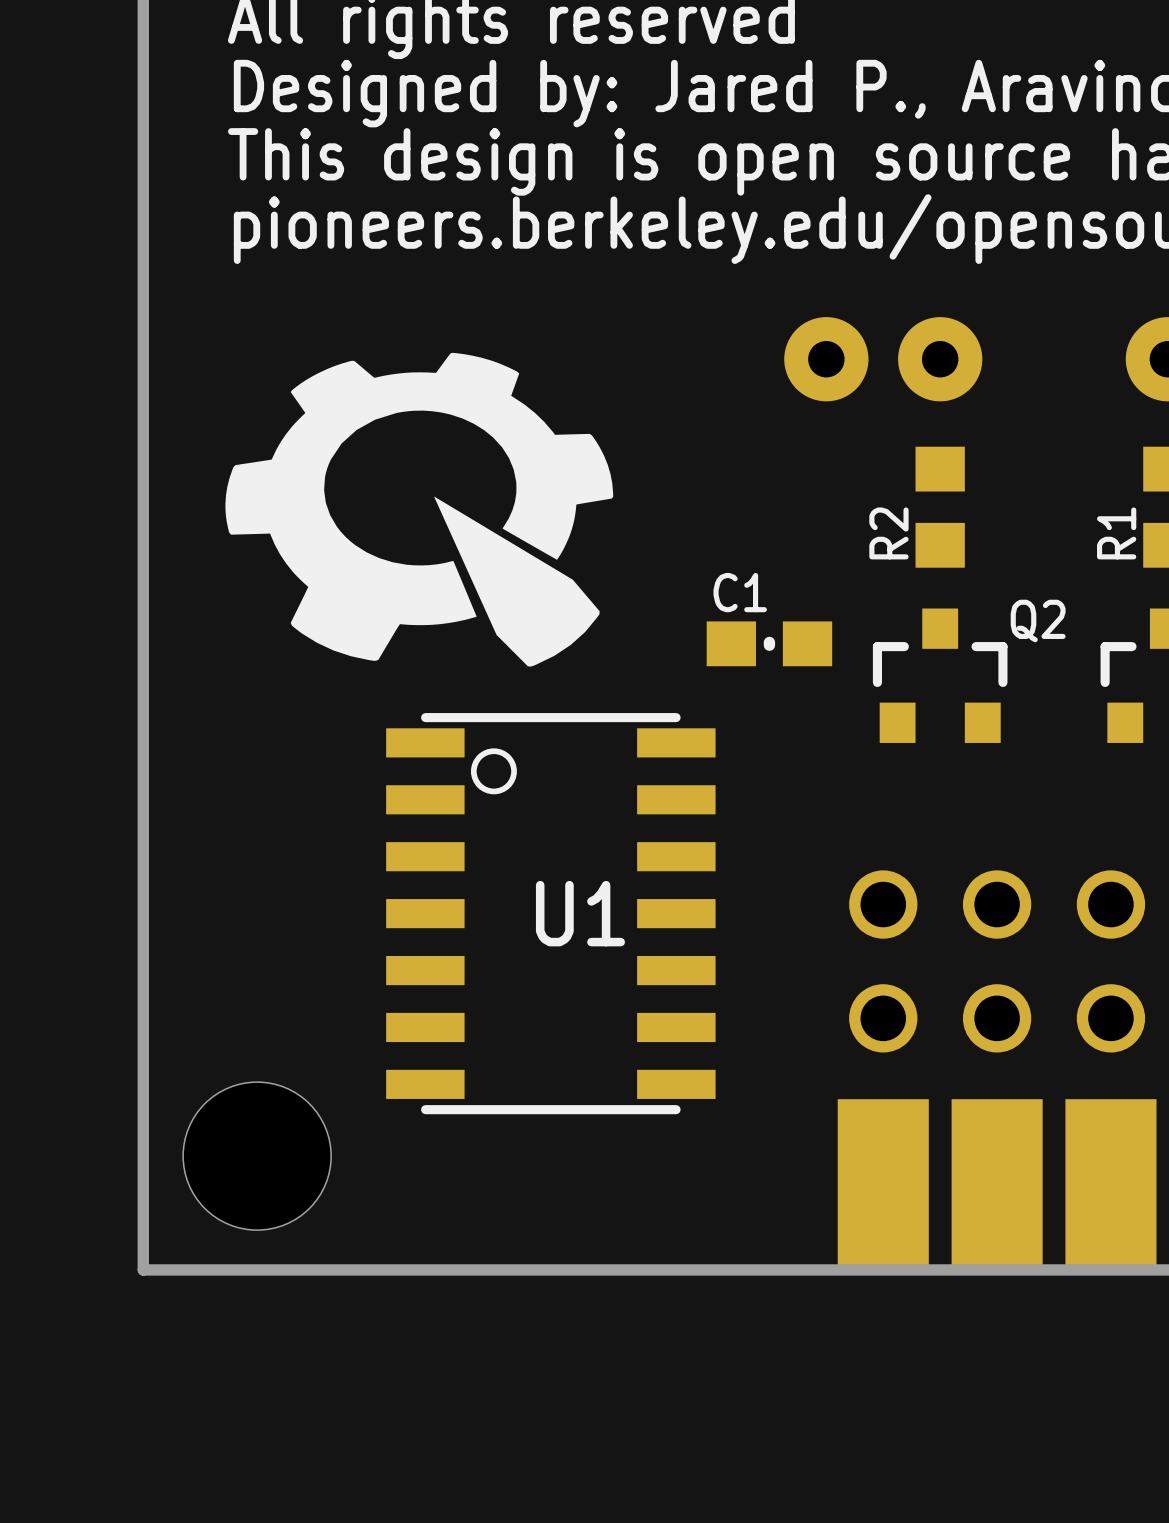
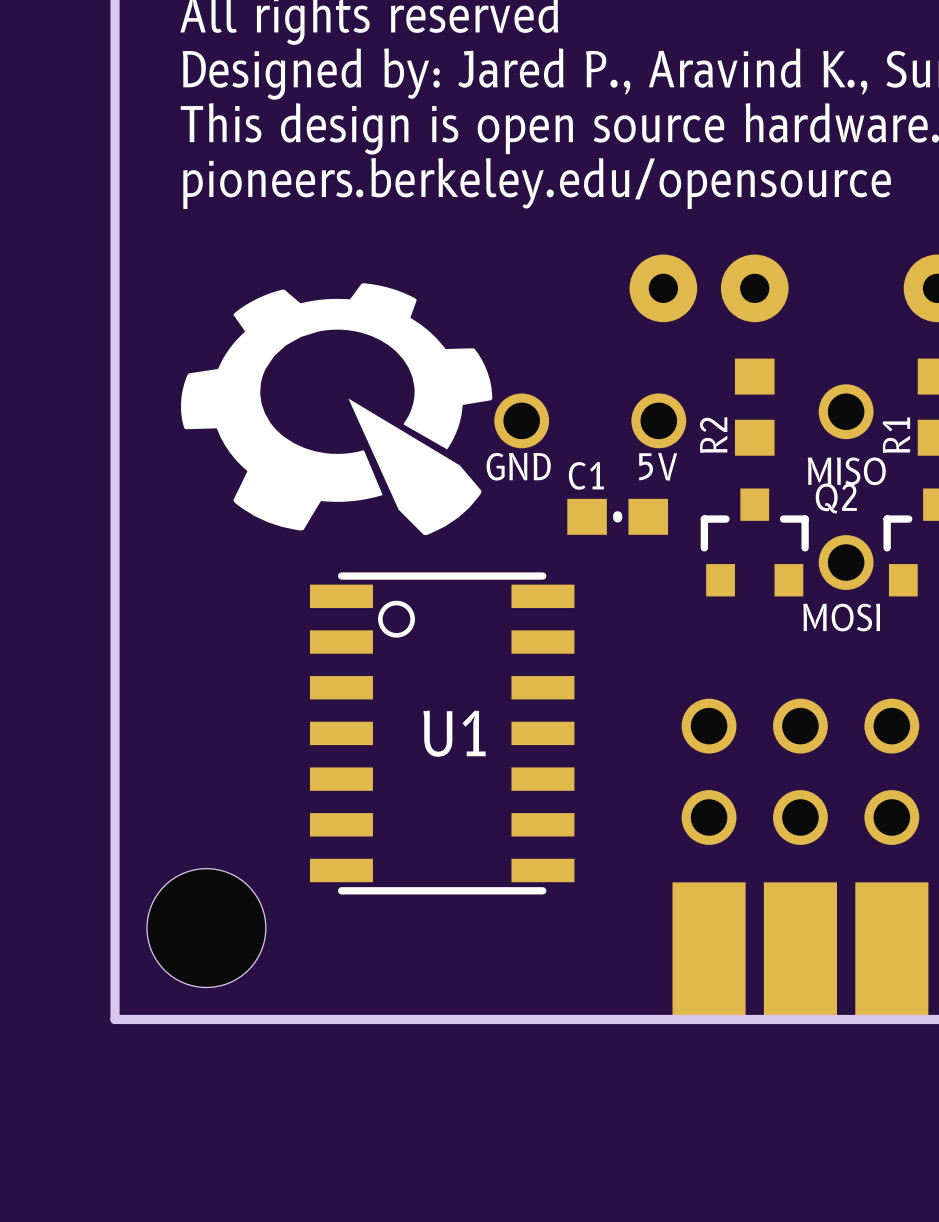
MISO: none -> (846, 411)
GND: none -> (521, 420)
5V: none -> (658, 420)
MOSI: none -> (846, 562)

